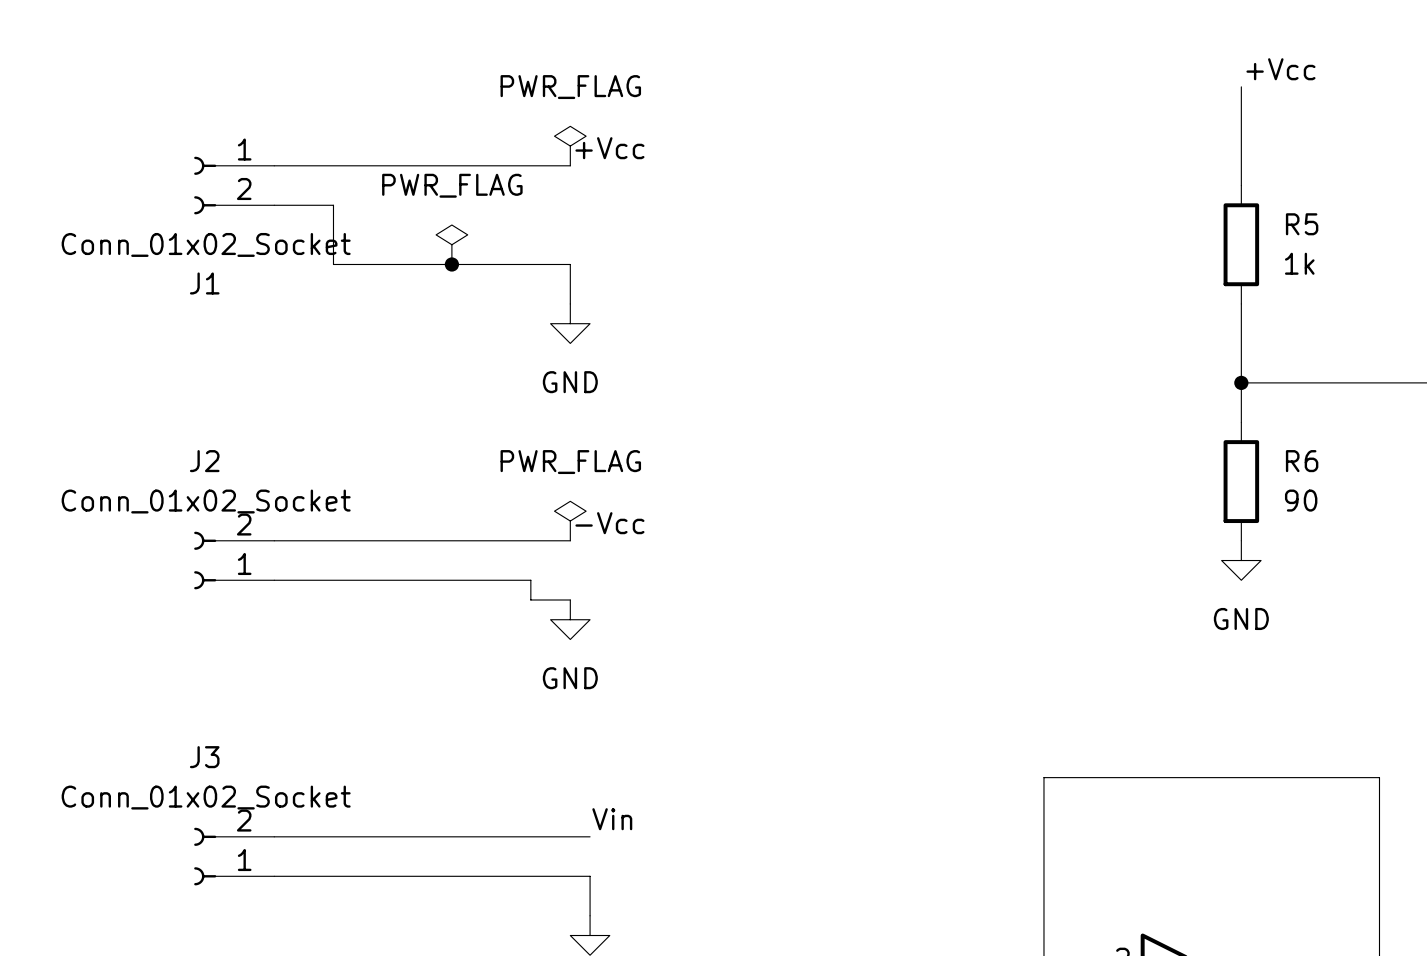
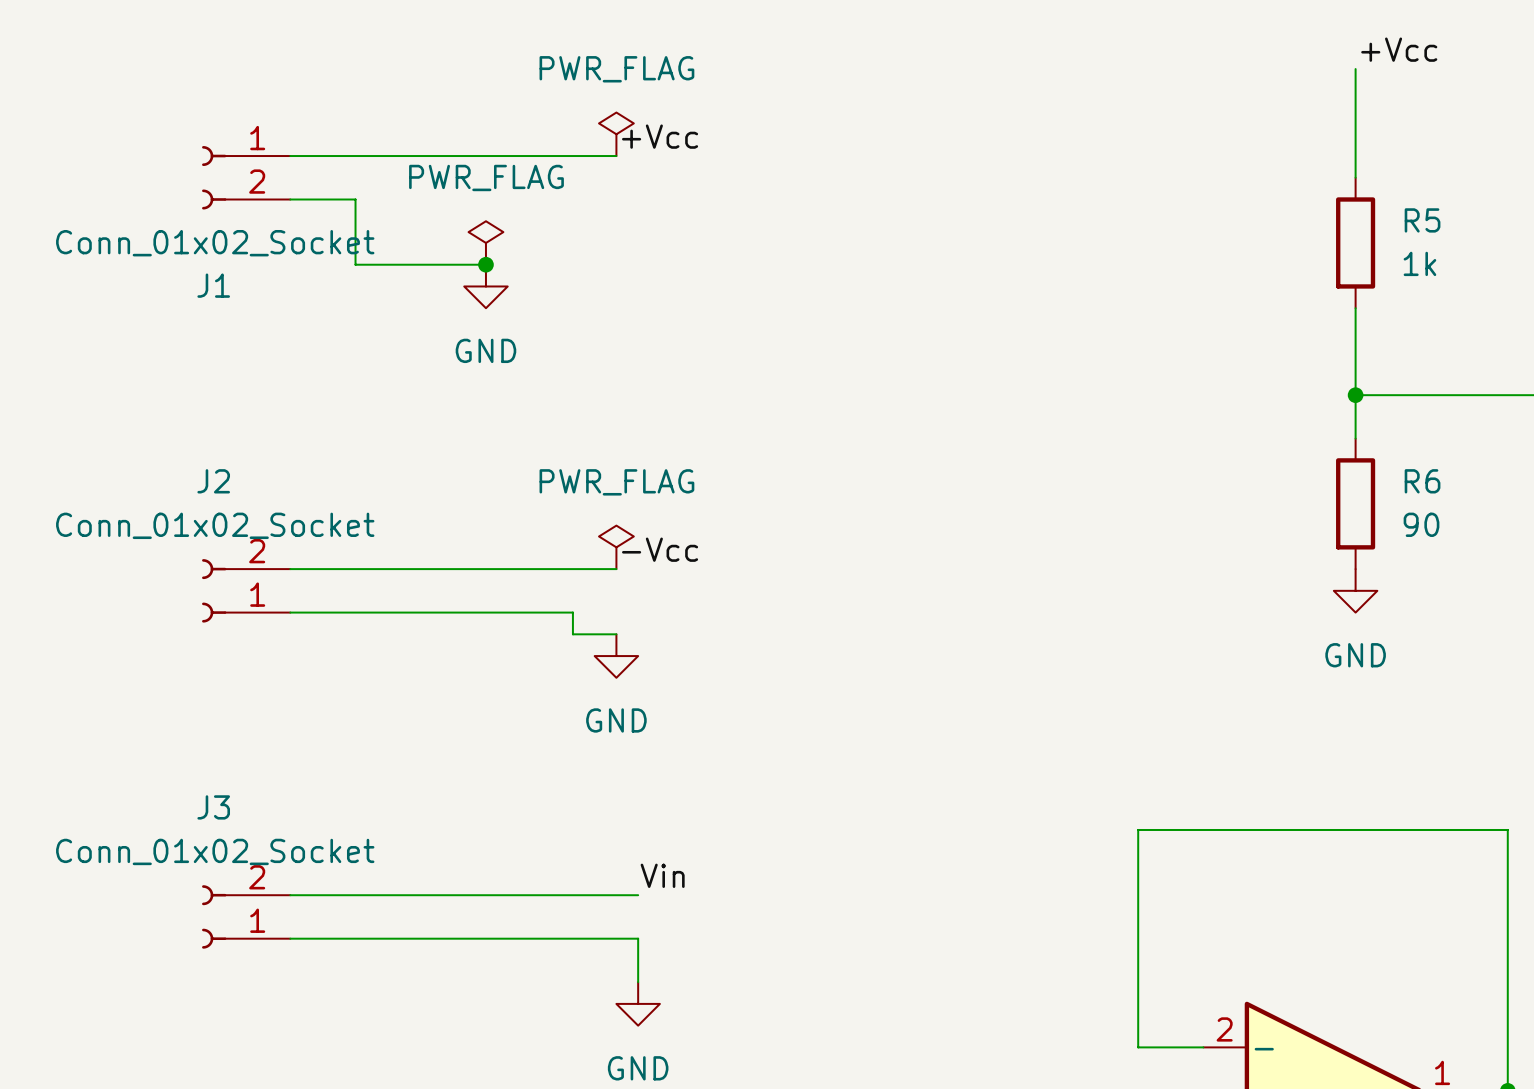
wire: (451, 264) (570, 264) (570, 303) -> none
power symbol position: GND (570, 323) -> GND (485, 286)

